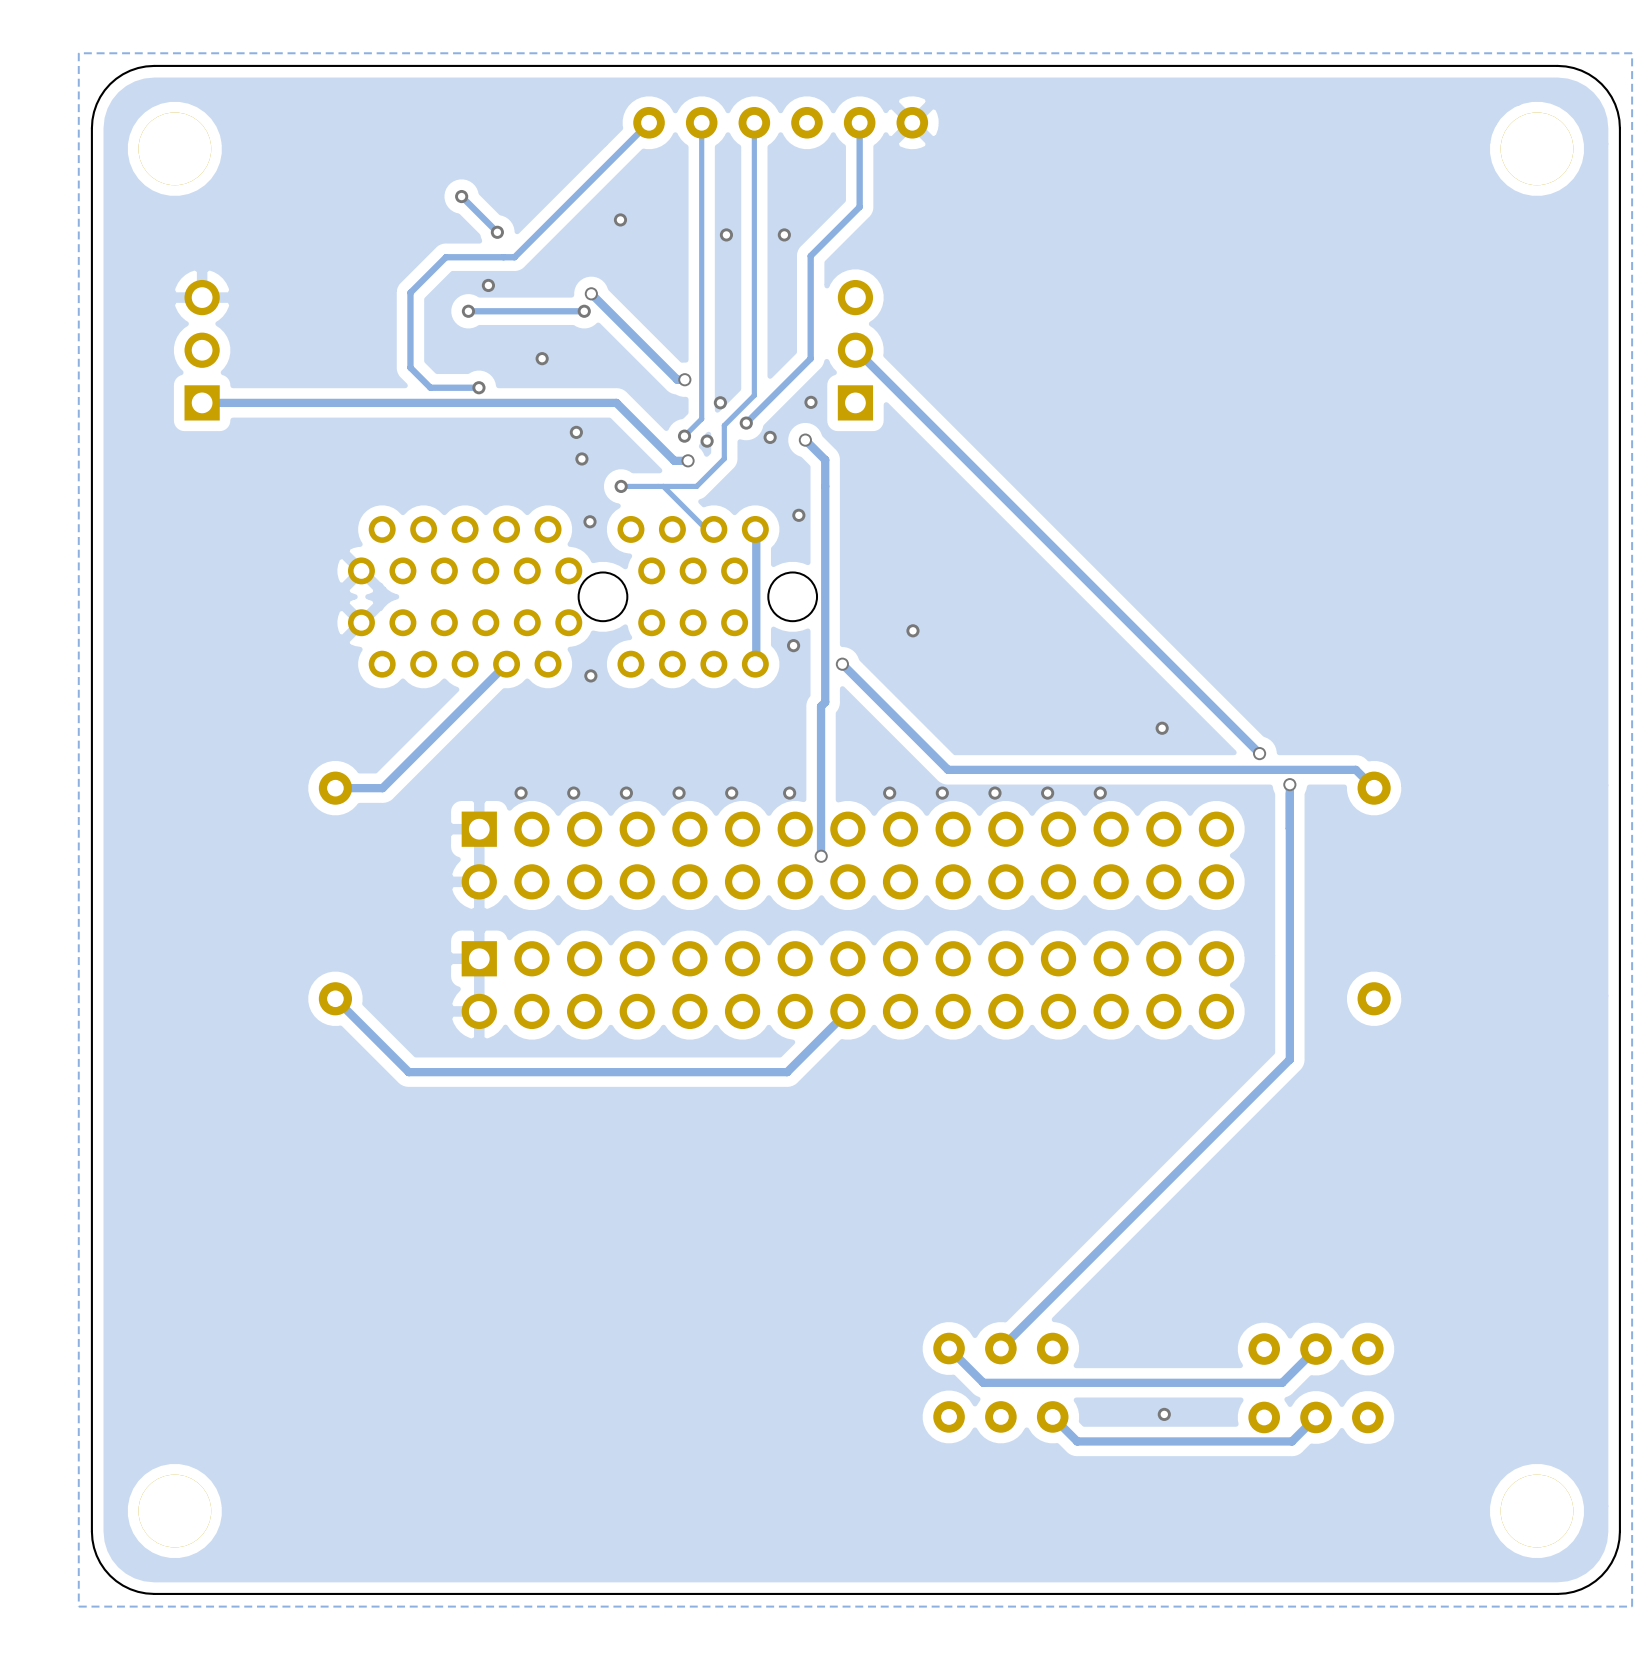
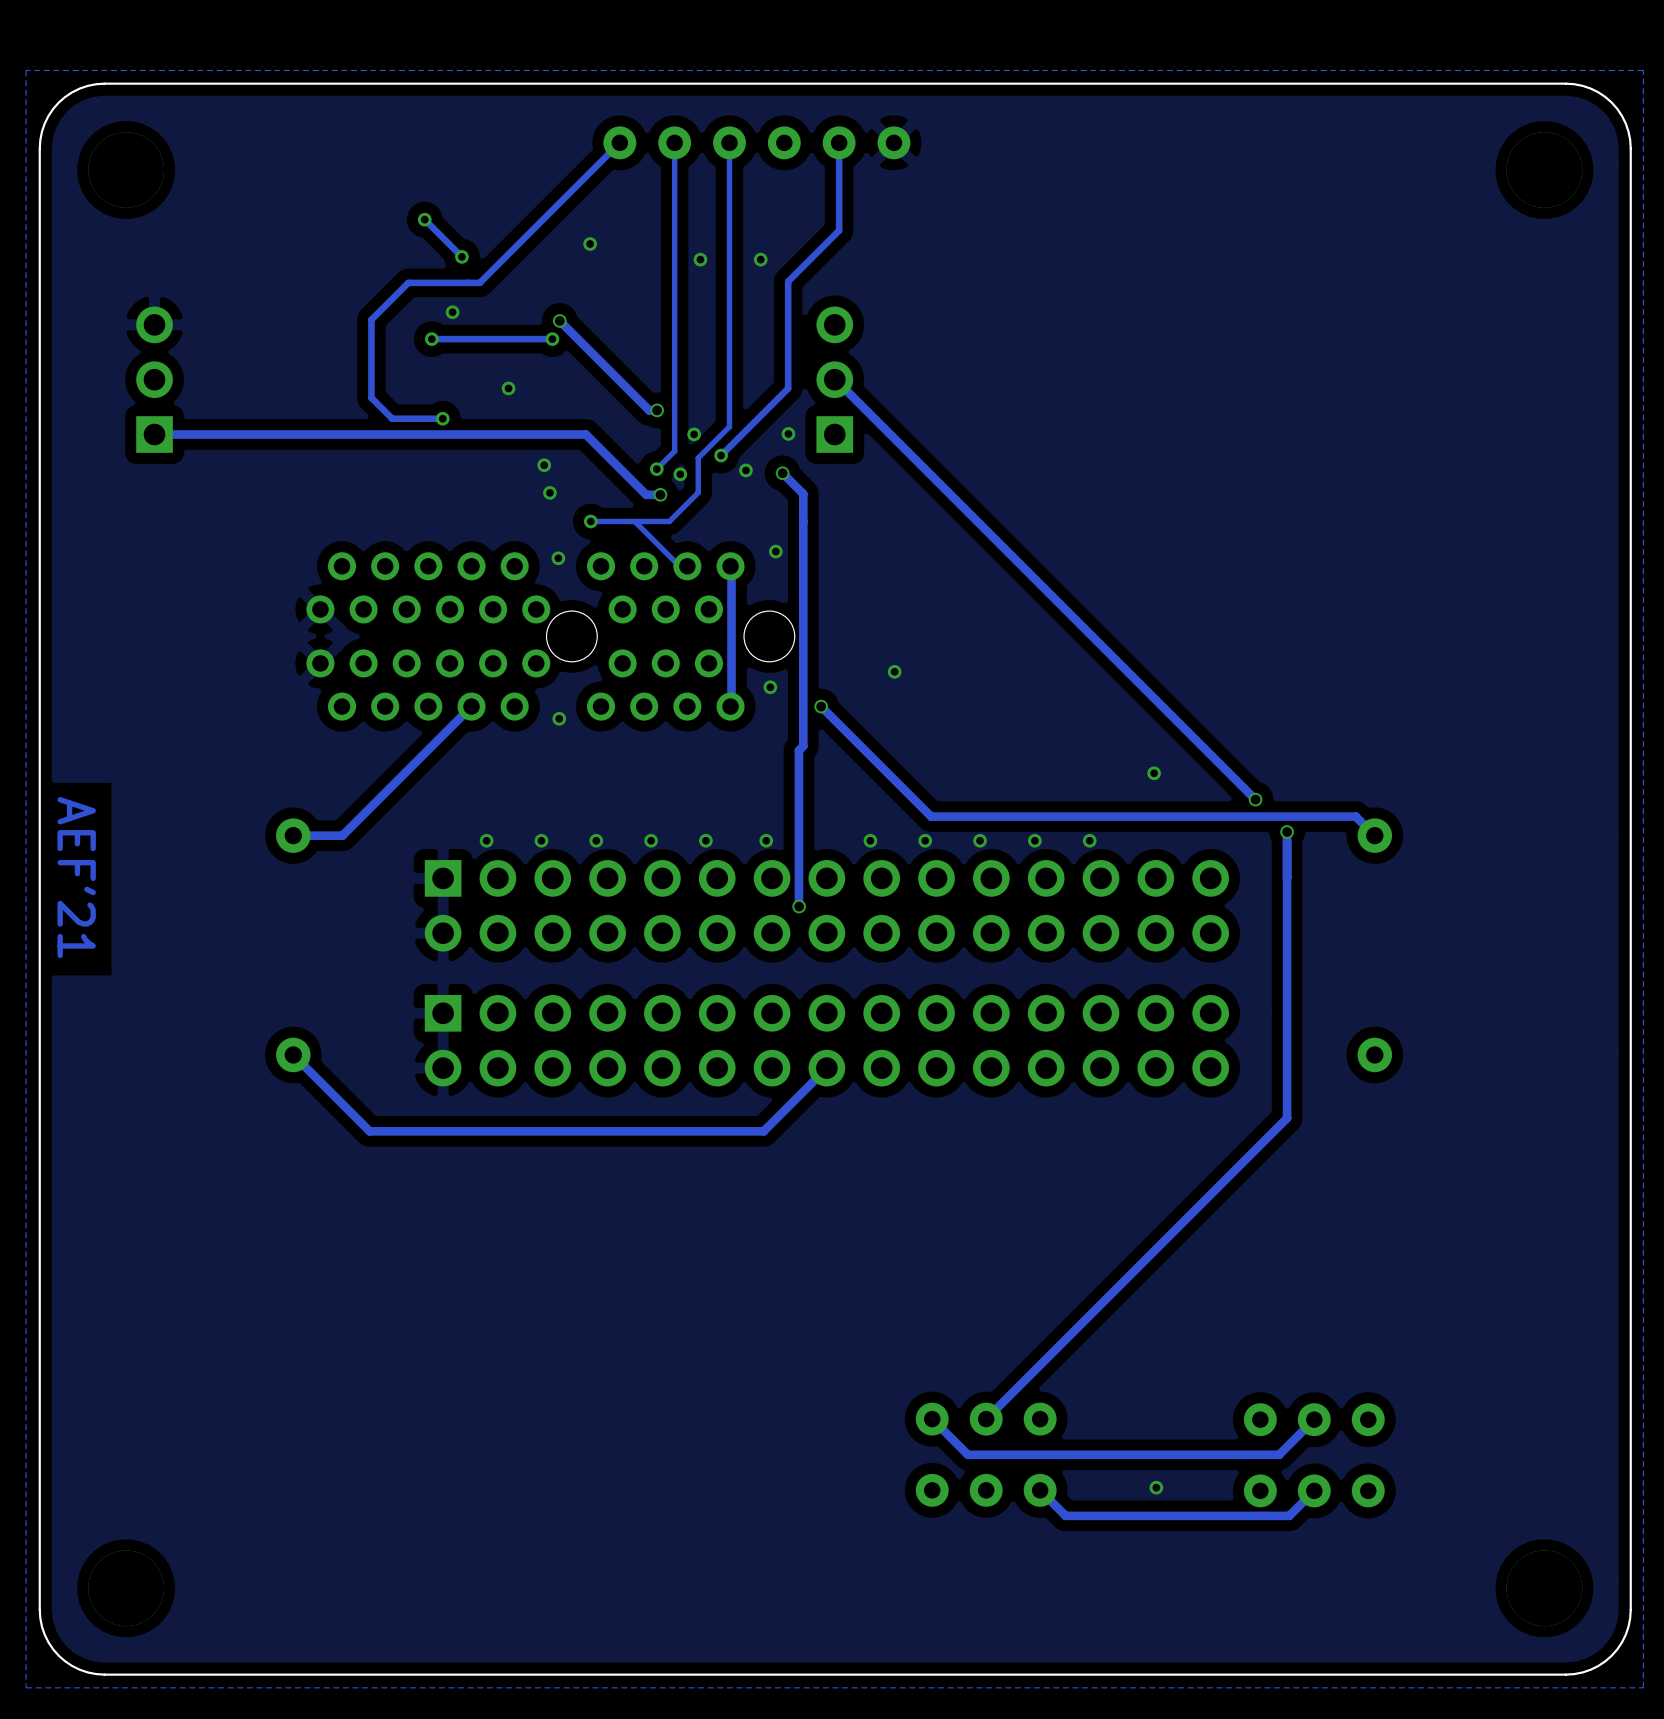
text: none -> AEF'21 (76, 877)

